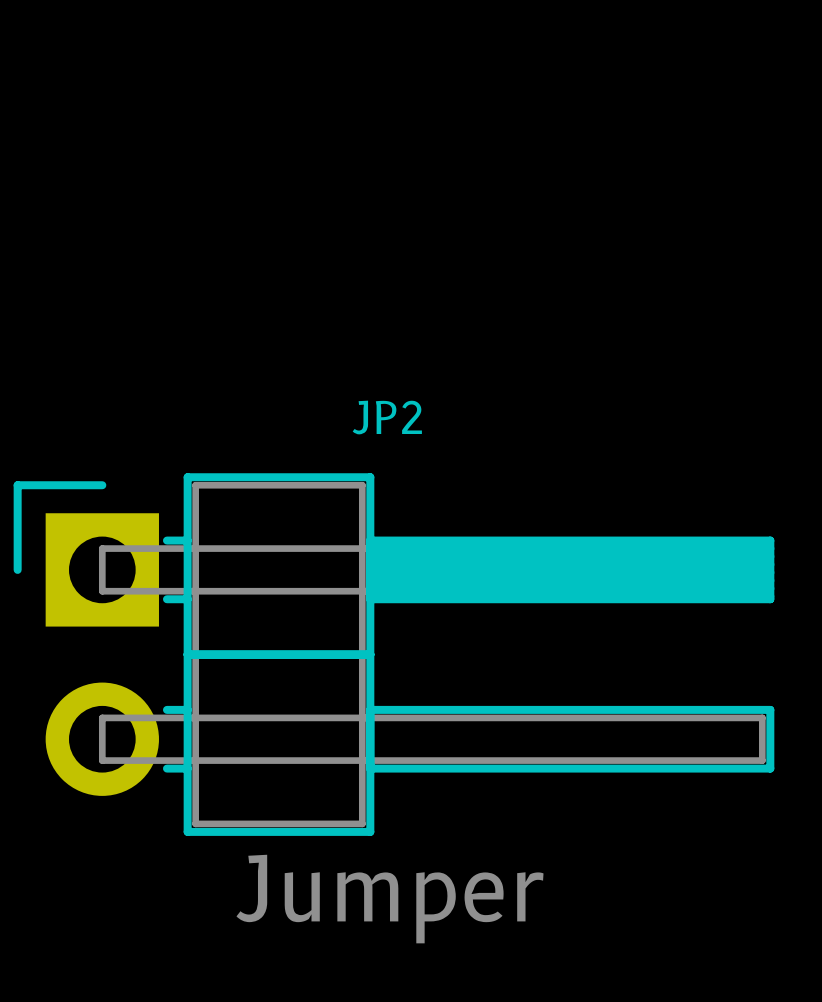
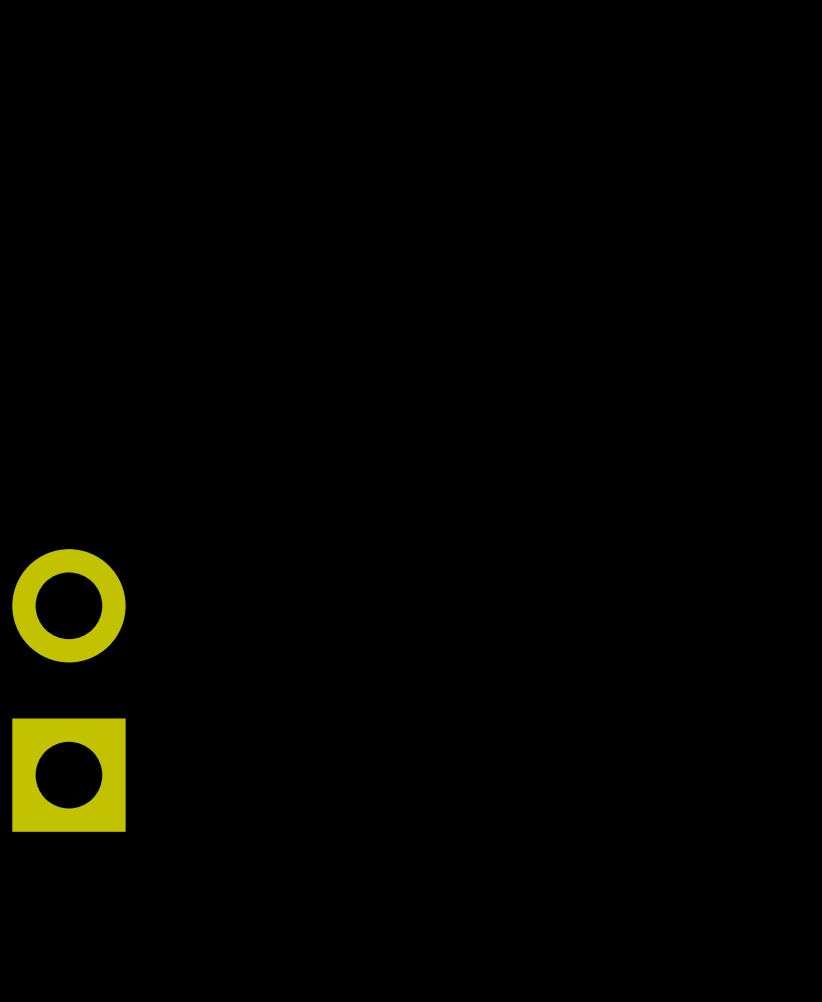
JP2 side: bottom (393, 654) -> top (68, 690)

